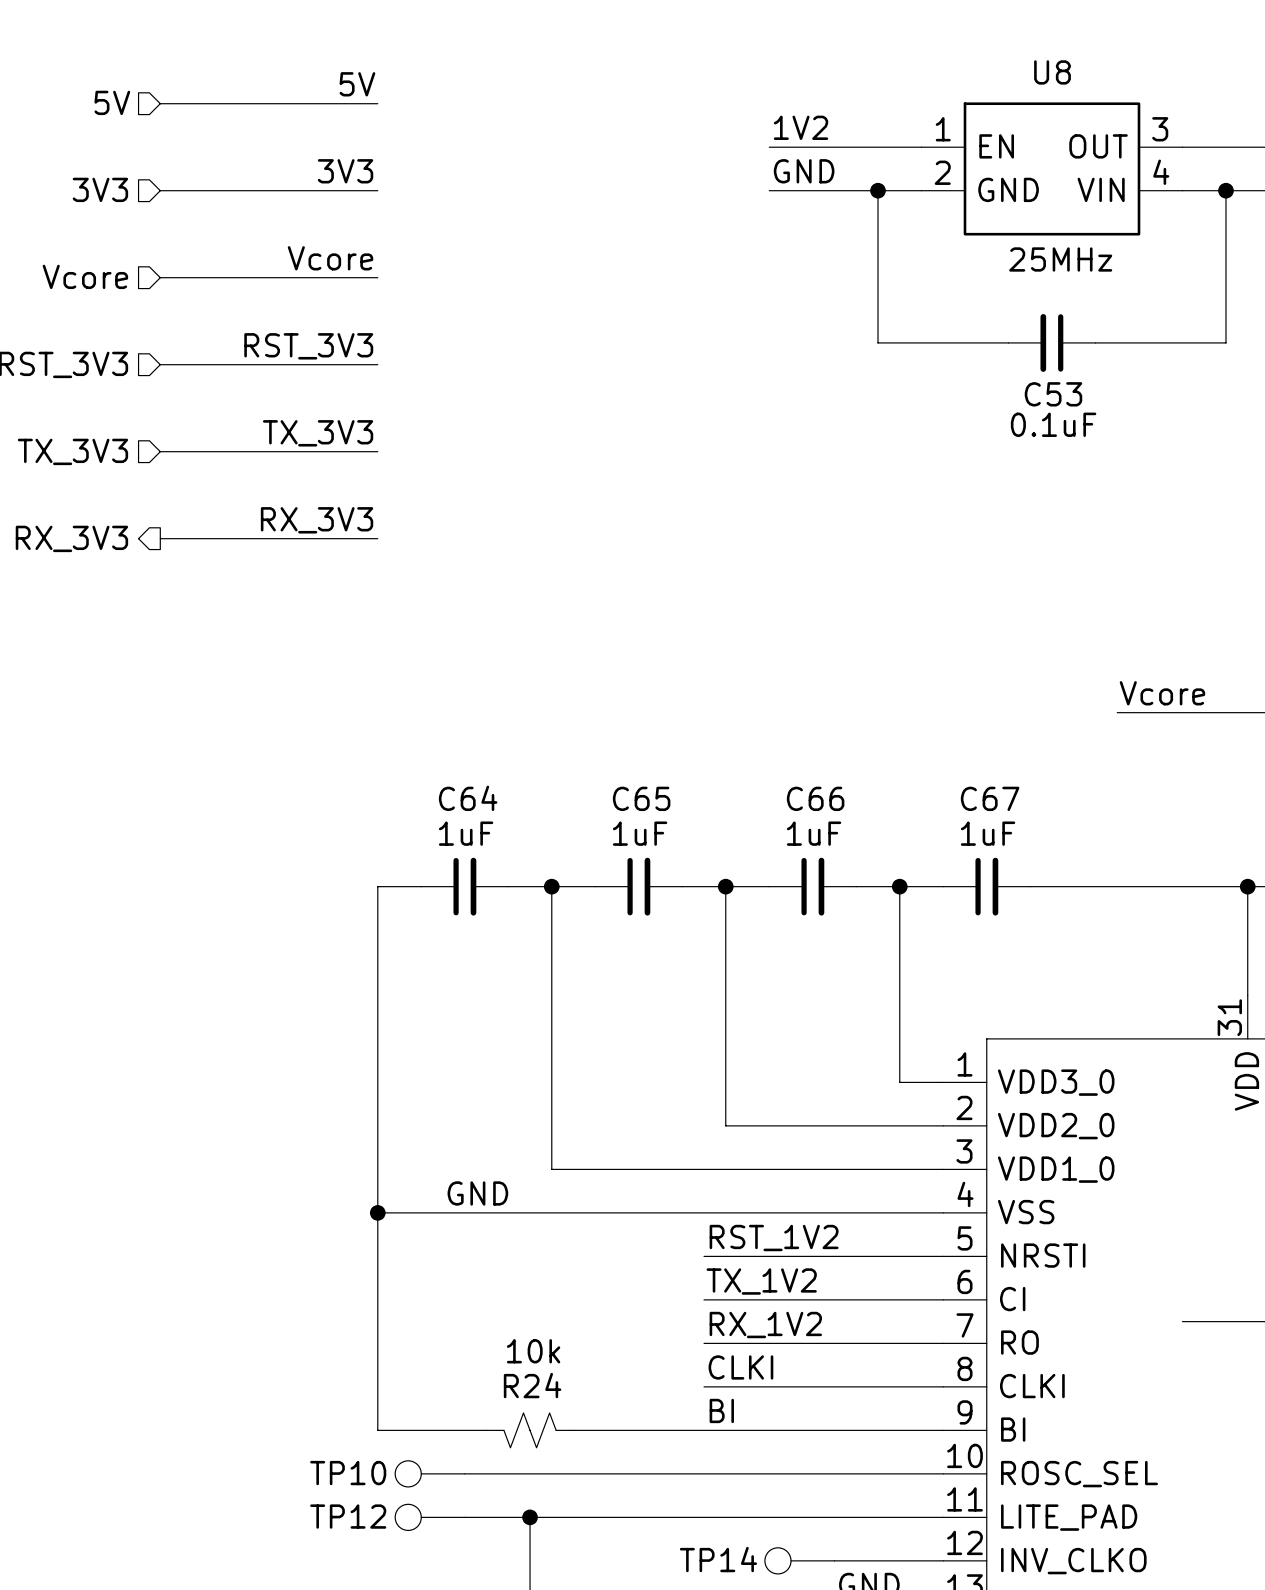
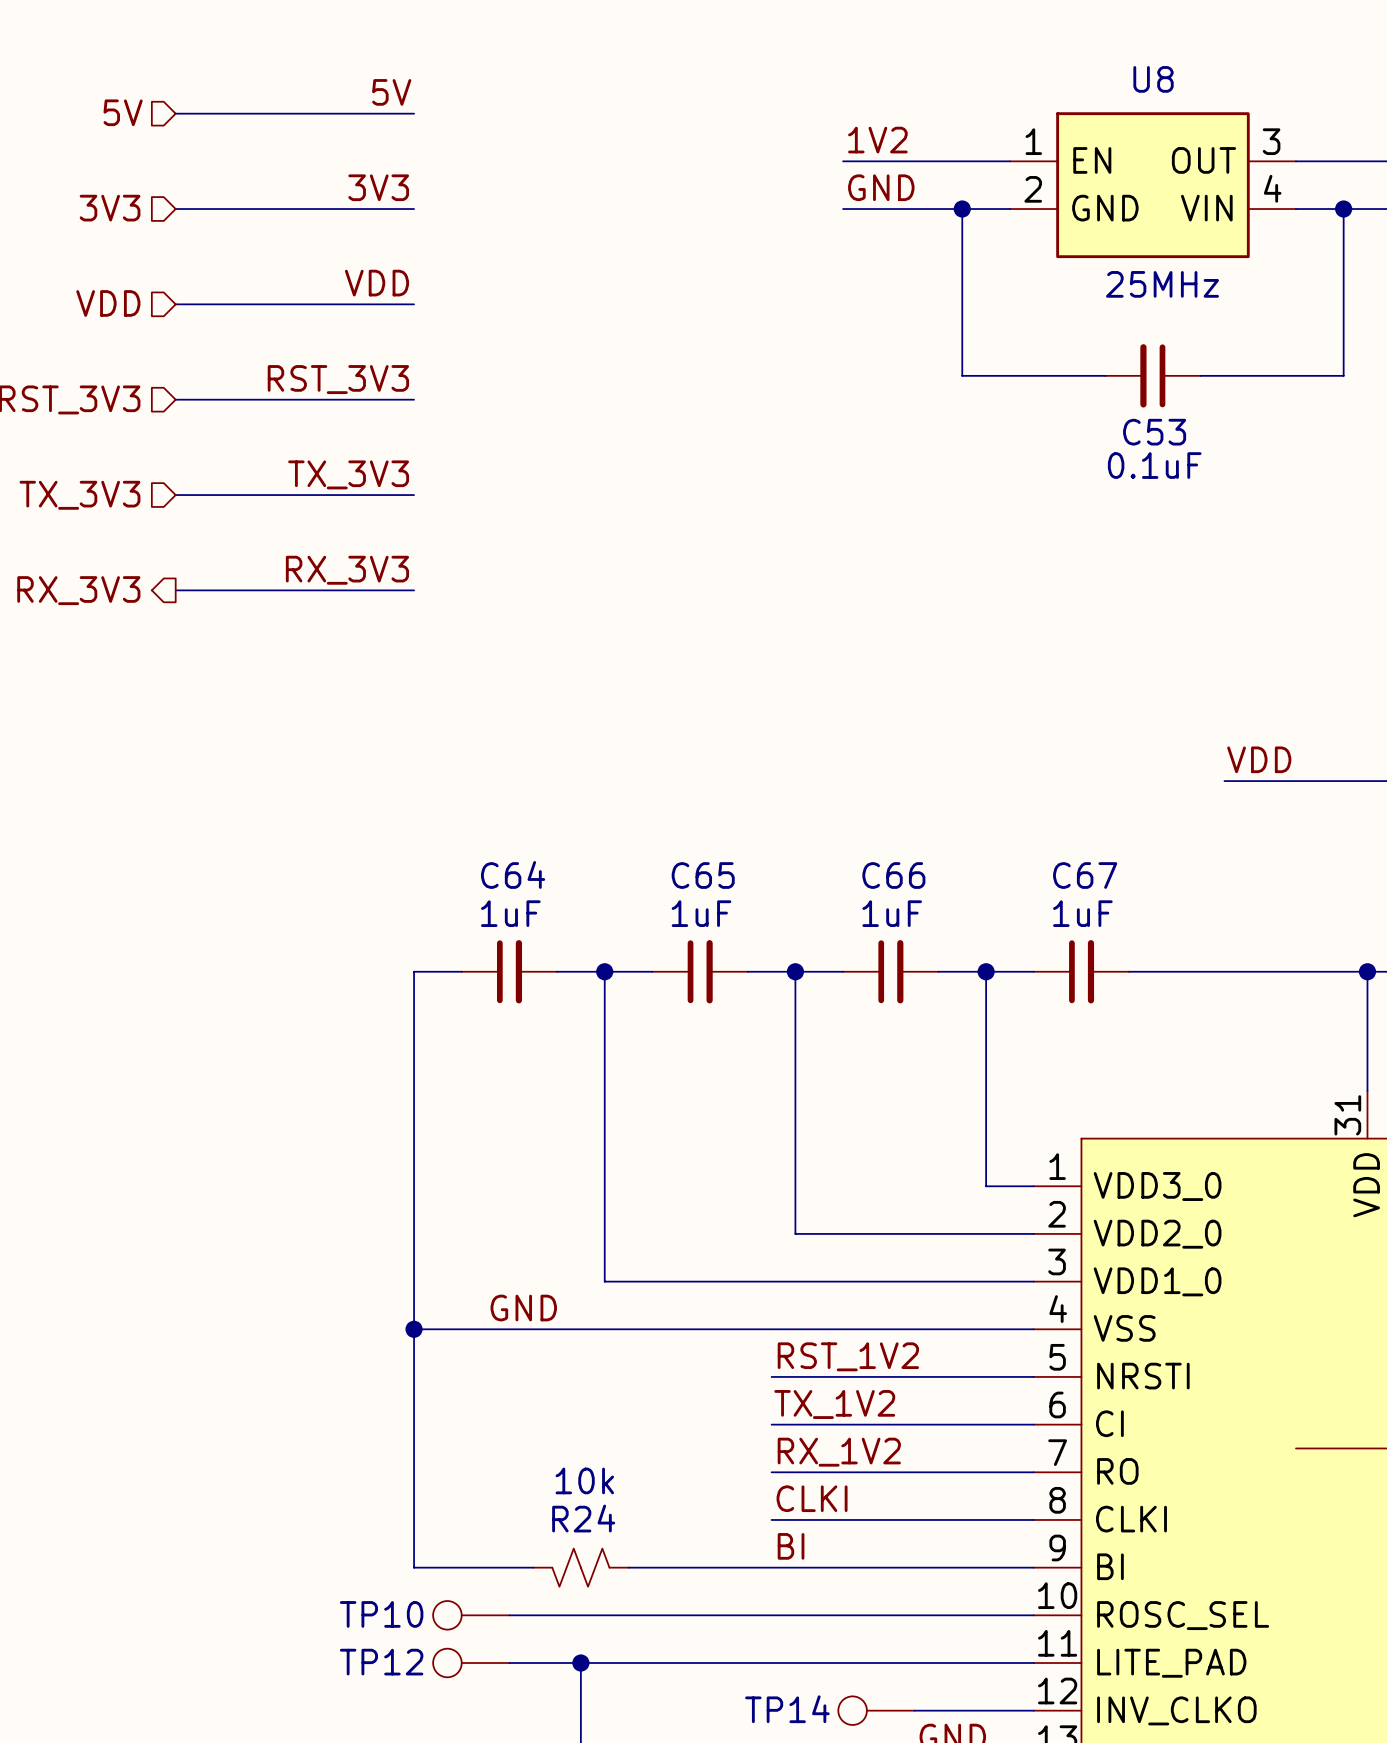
label: Vcore (330, 258) -> VDD (376, 283)
hierarchical label: Vcore (85, 276) -> VDD (108, 303)
label: Vcore (1162, 693) -> VDD (1259, 759)

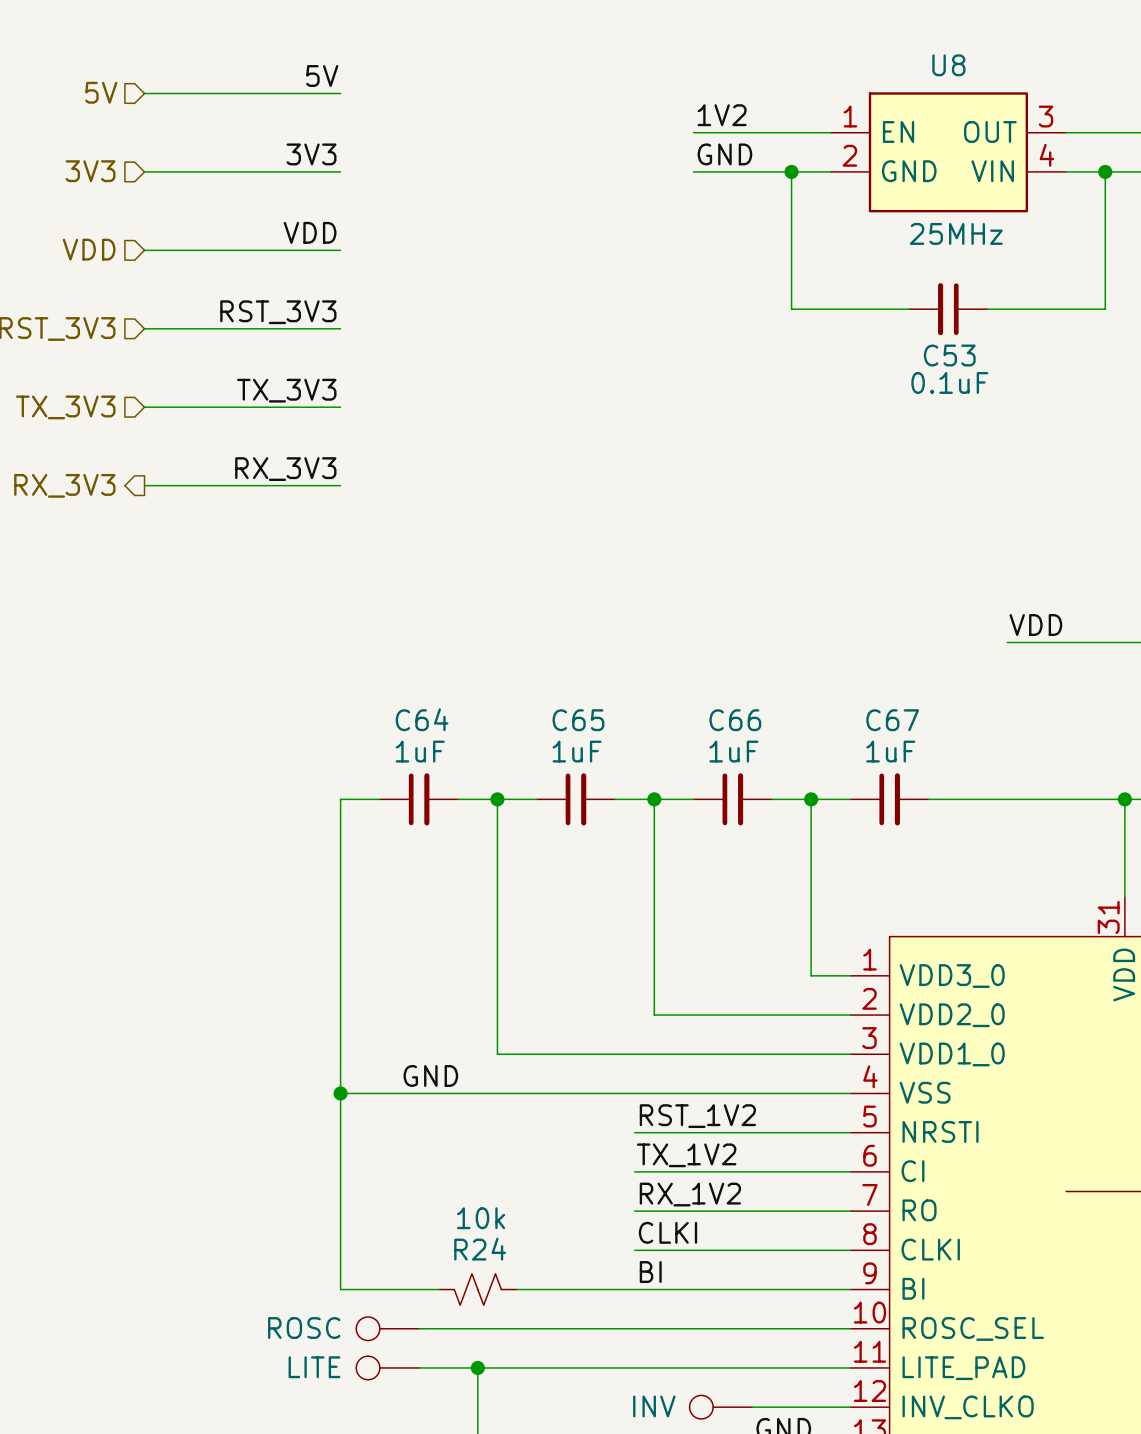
TP10 value: none -> ROSC (304, 1328)
TP10 name: TP10 (381, 1614) -> none
TP12 name: TP12 (381, 1662) -> none
TP12 value: none -> LITE (314, 1367)
TP14 name: TP14 (787, 1709) -> none
TP14 value: none -> INV (654, 1406)

